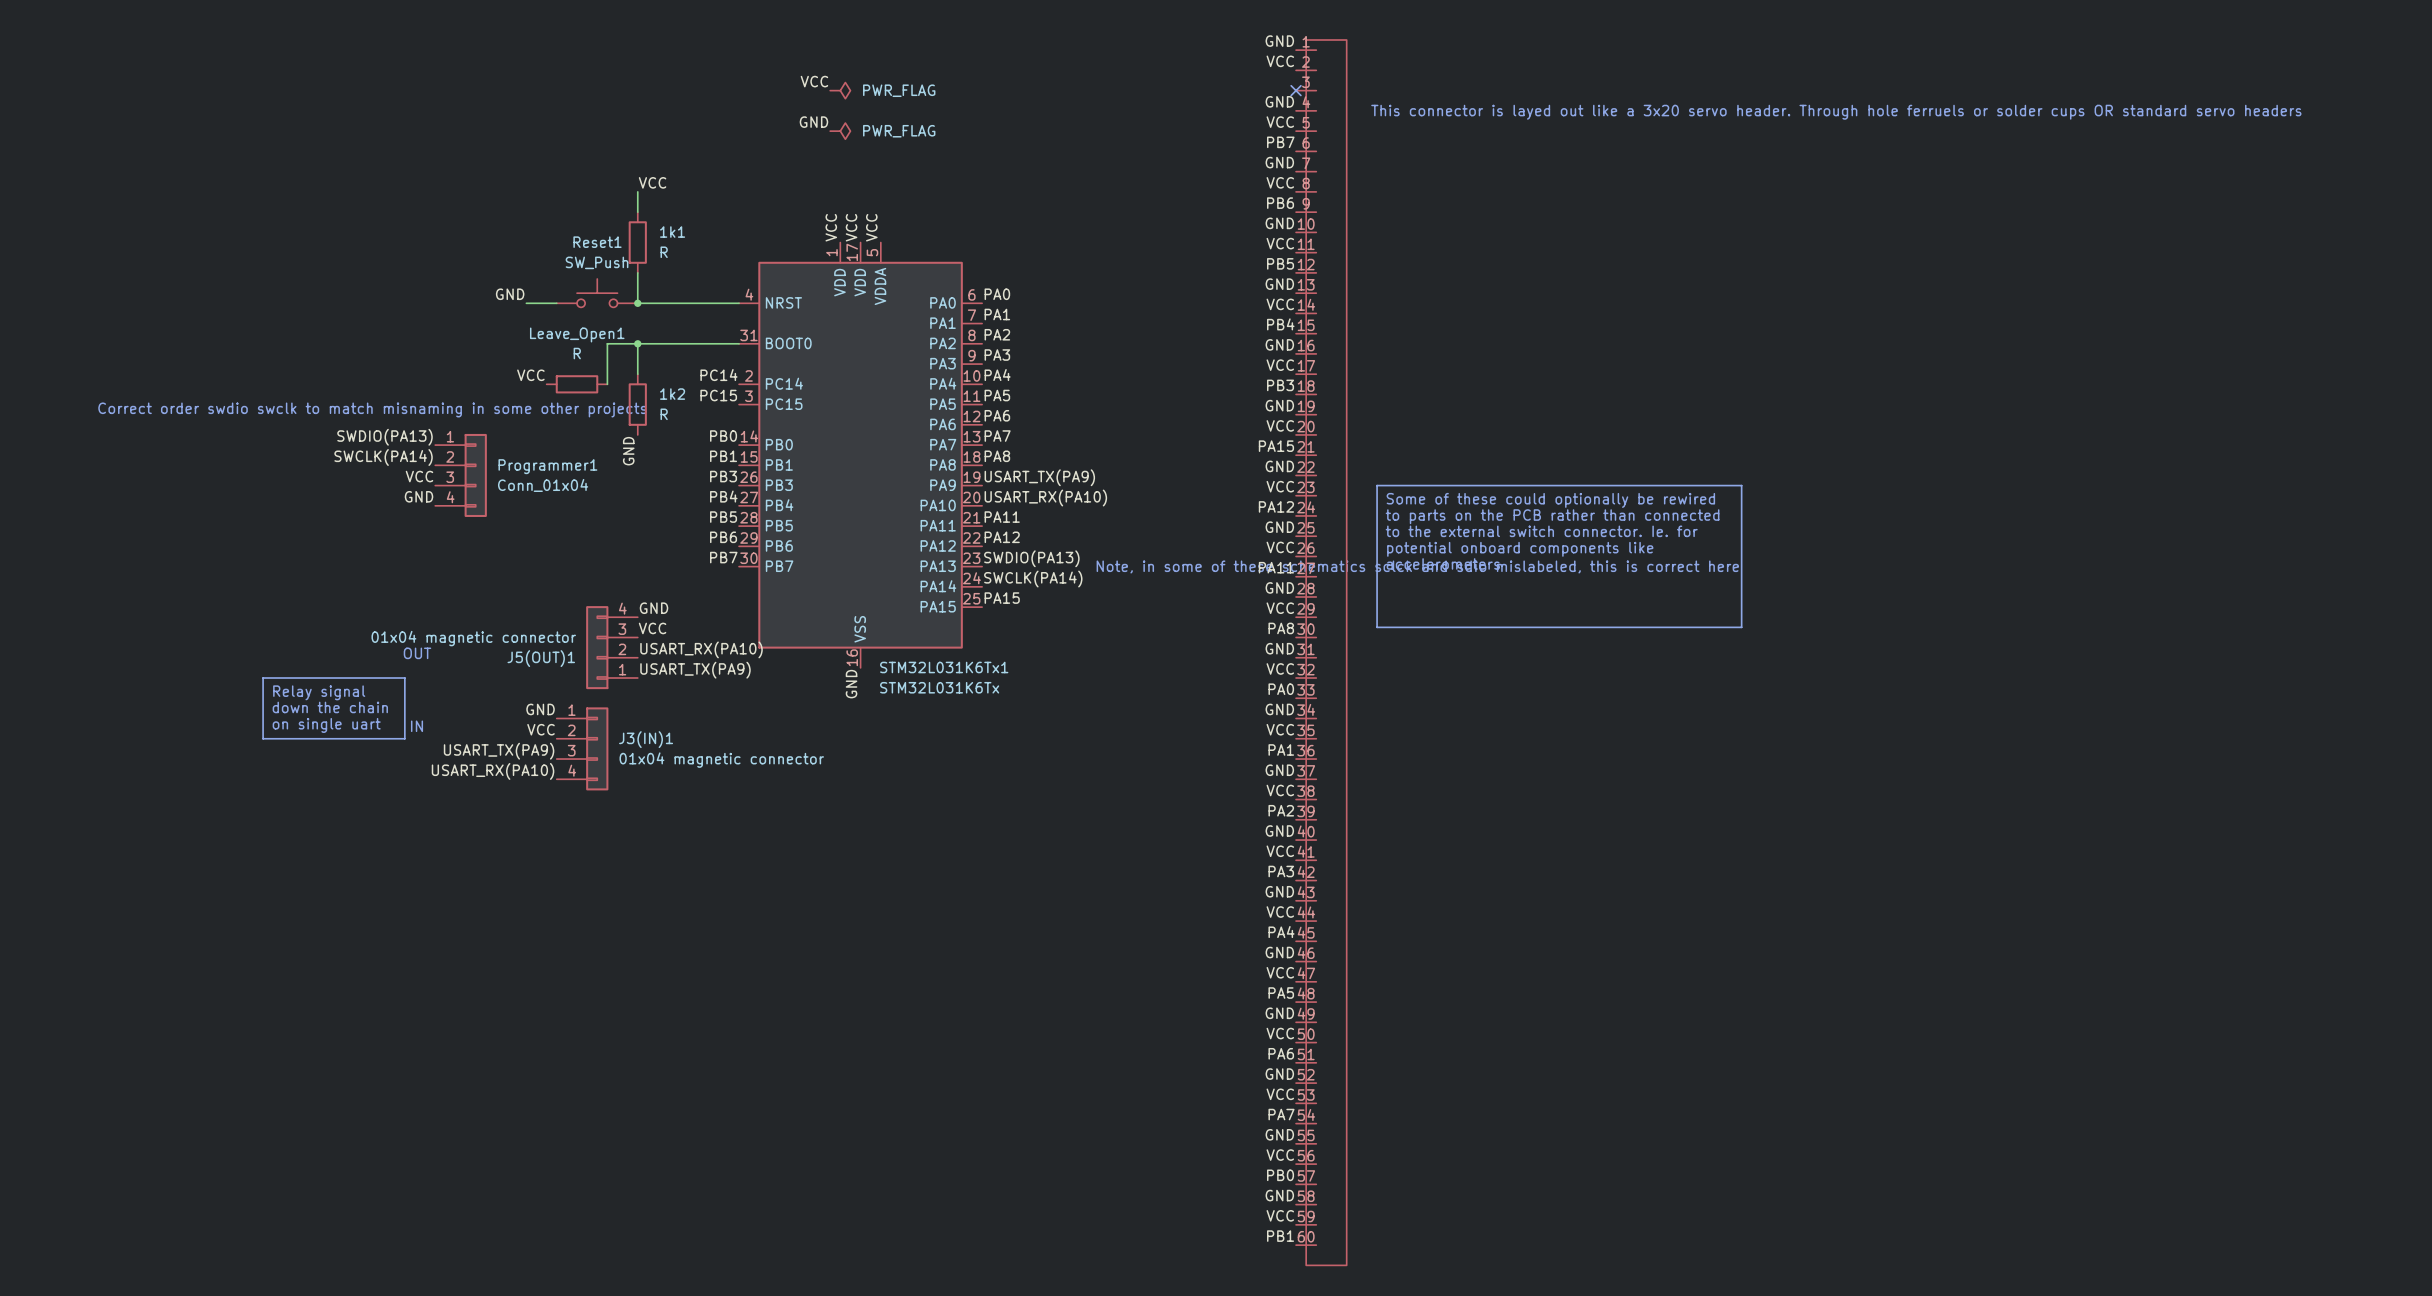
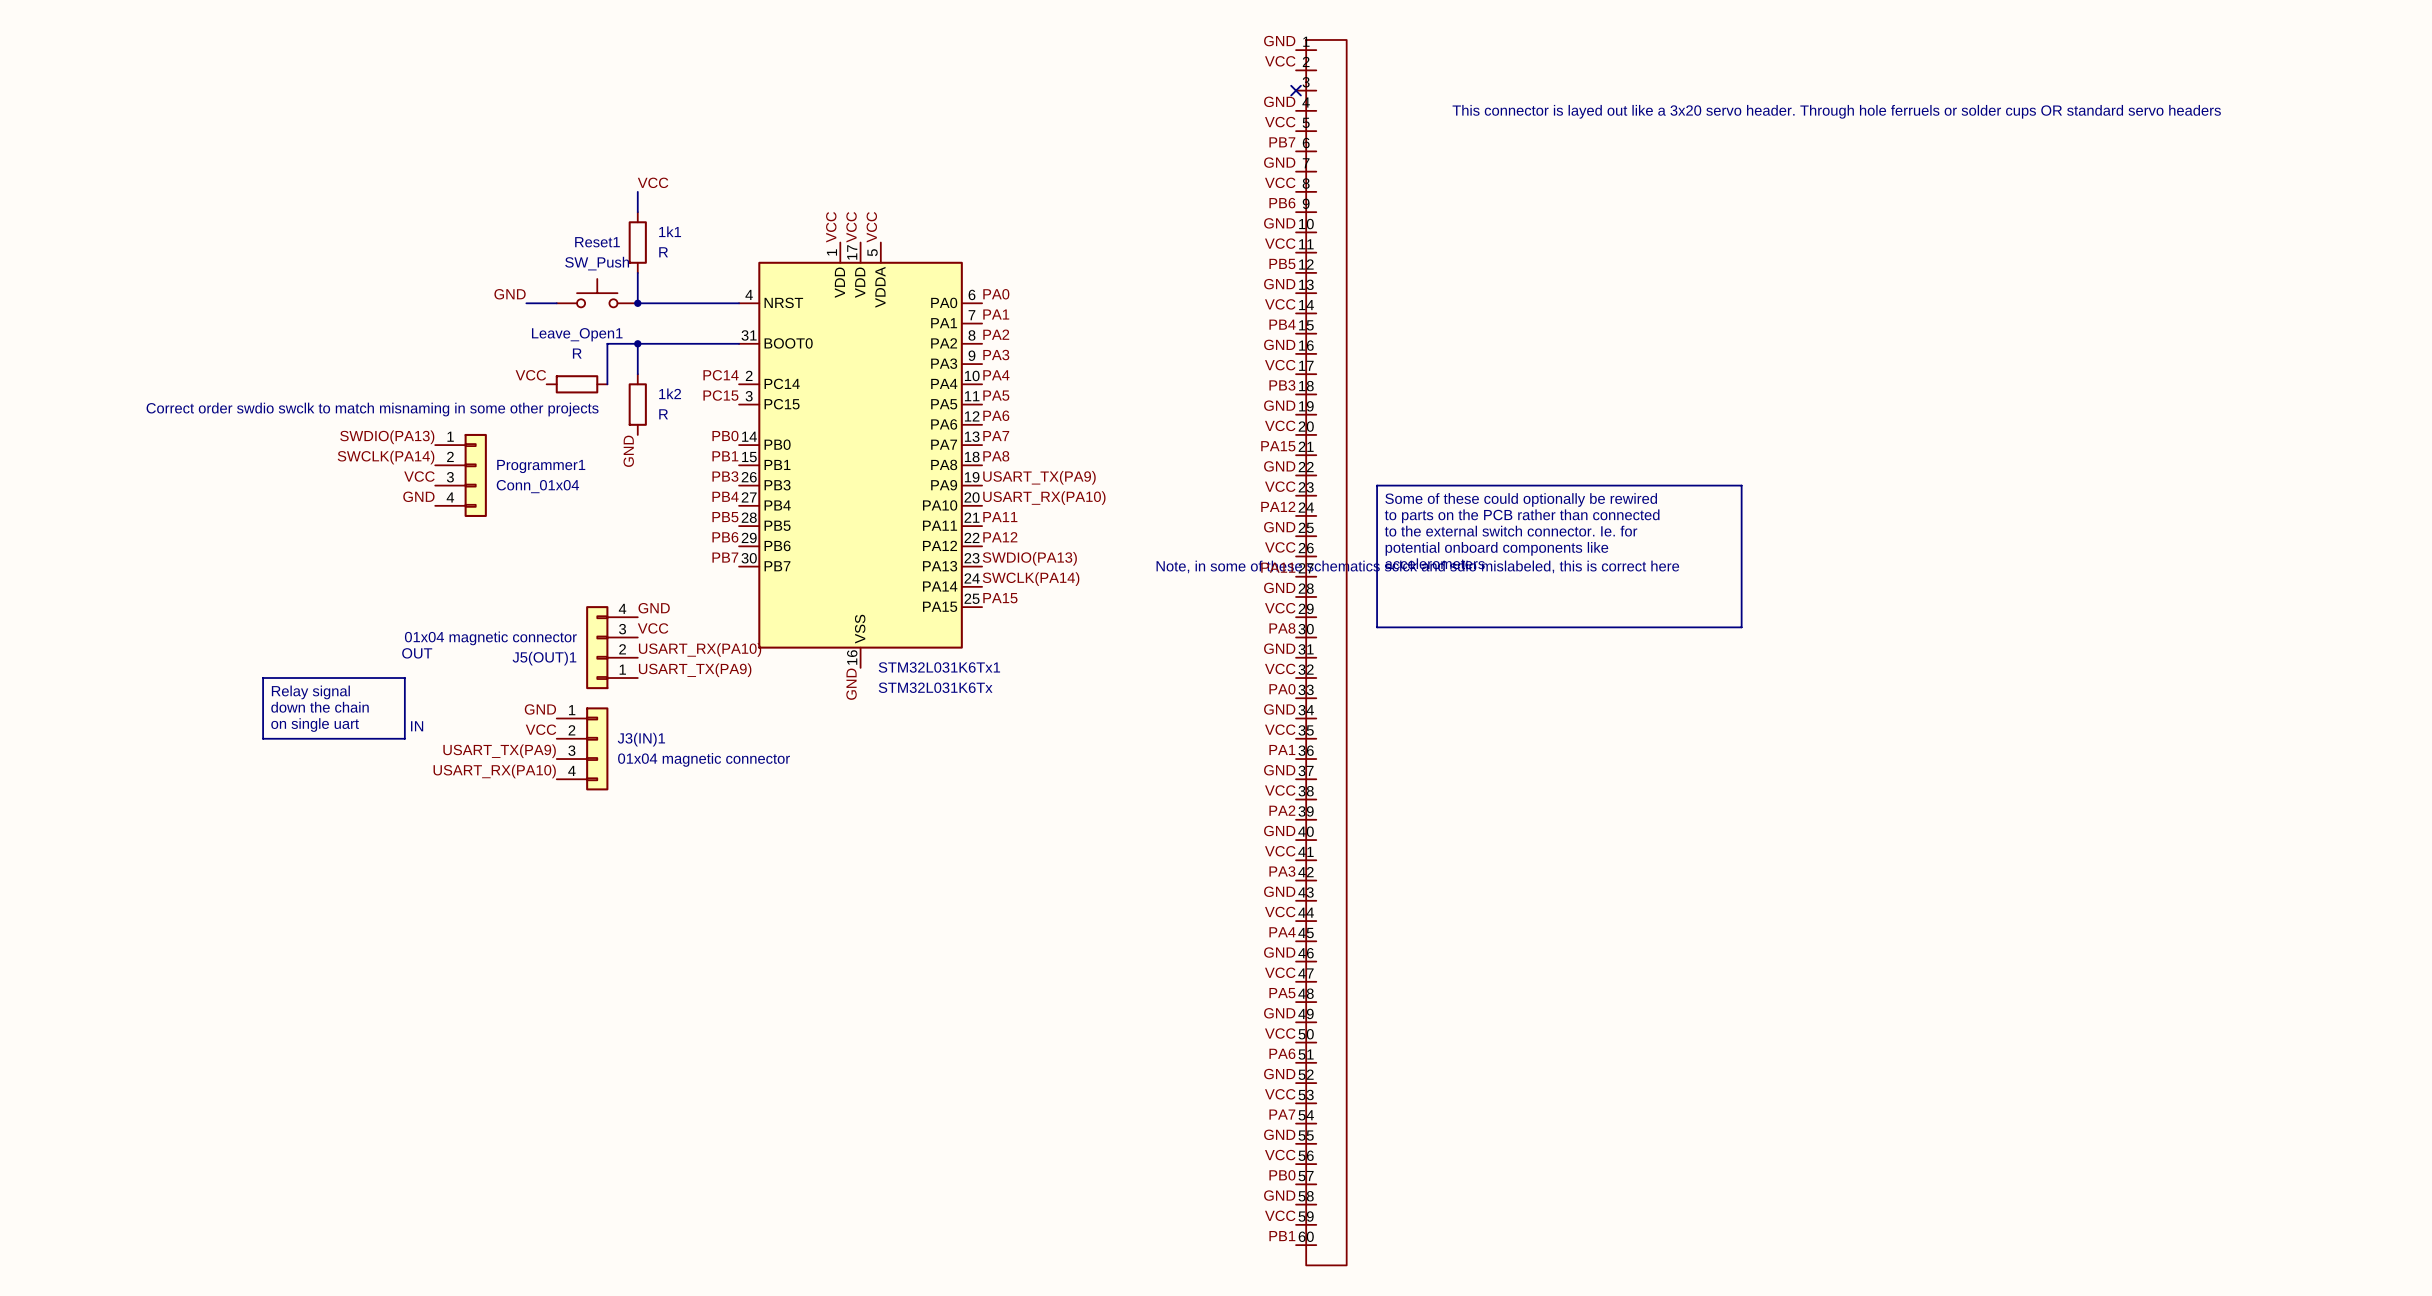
label: VCC (814, 81) -> none
power symbol: PWR_FLAG (840, 90) -> none
label: GND (813, 122) -> none
power symbol: PWR_FLAG (840, 131) -> none

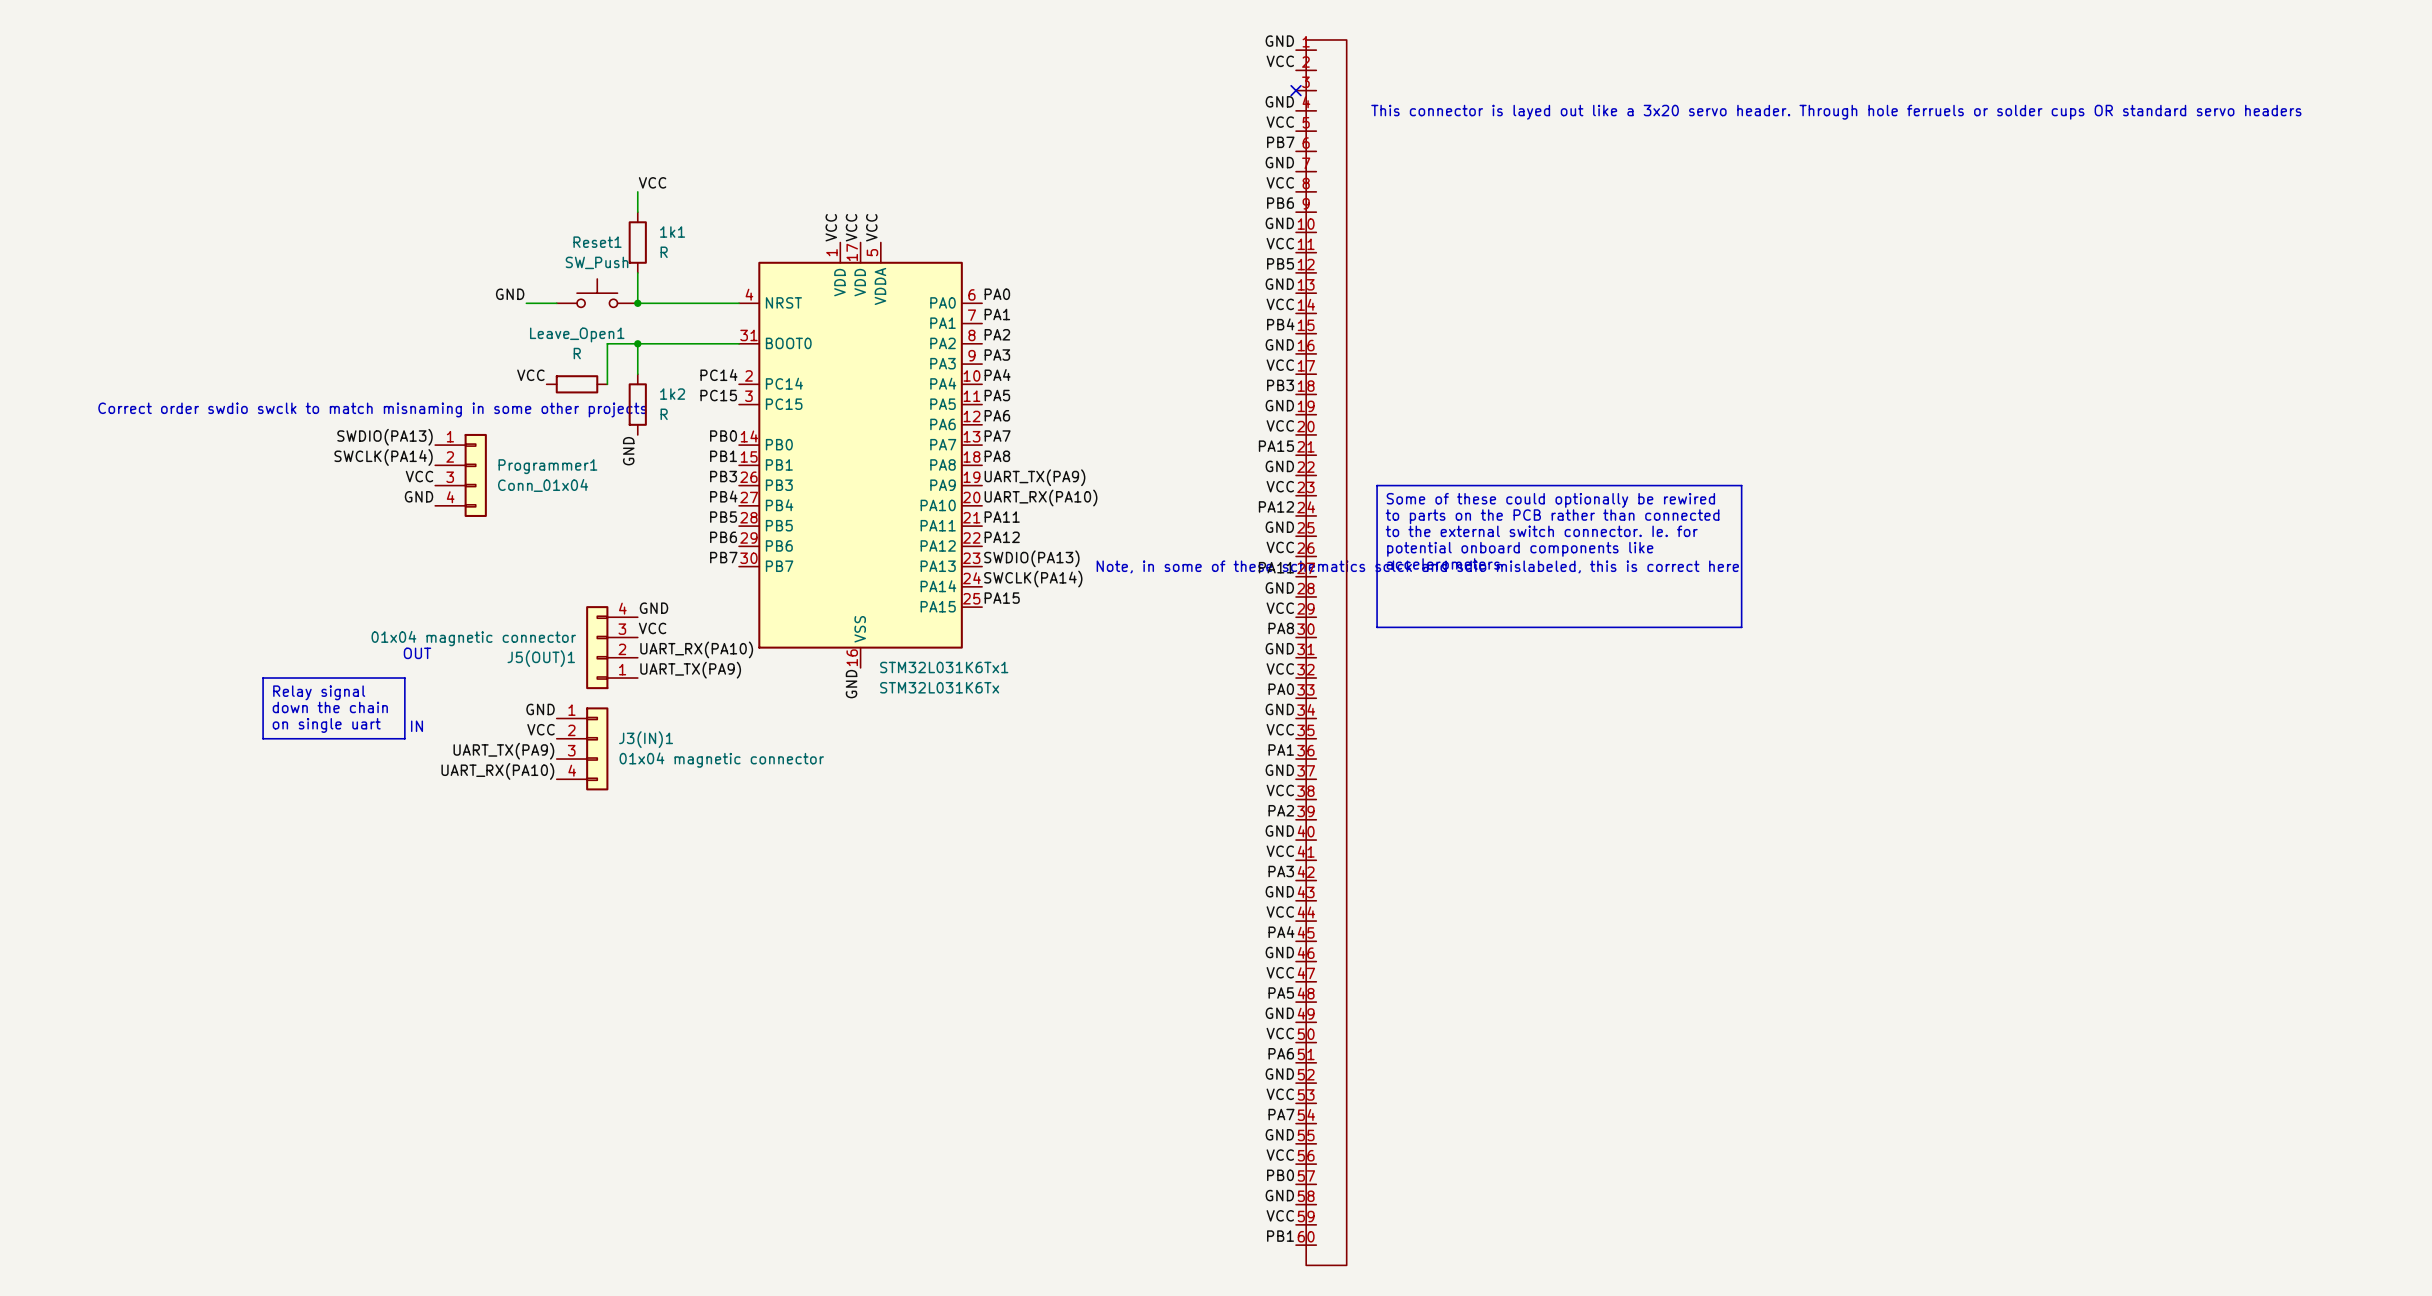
label: USART_TX(PA9) (1039, 477) -> UART_TX(PA9) (1034, 477)
label: USART_RX(PA10) (1044, 498) -> UART_RX(PA10) (1041, 498)
label: USART_RX(PA10) (700, 649) -> UART_RX(PA10) (696, 649)
label: USART_TX(PA9) (695, 670) -> UART_TX(PA9) (690, 670)
label: USART_TX(PA9) (499, 751) -> UART_TX(PA9) (503, 751)
label: USART_RX(PA10) (494, 771) -> UART_RX(PA10) (497, 771)

